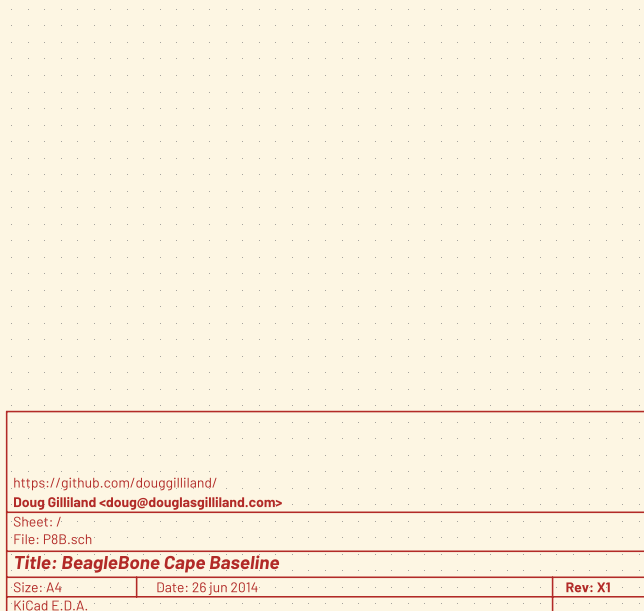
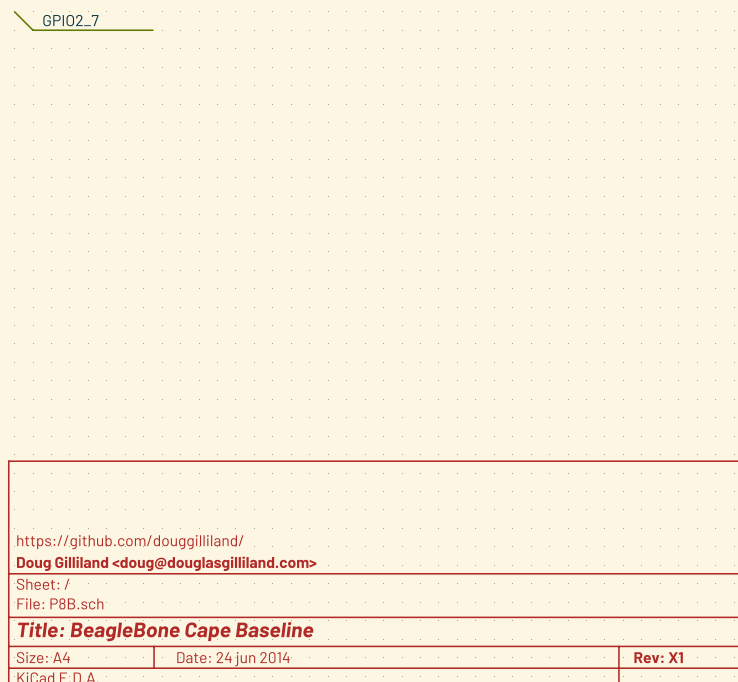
wire: none -> (14, 11) (33, 30) (152, 30)
label: none -> GPIO2_7 (70, 20)
title block: Date: 26 jun 2014 (207, 588) -> Date: 24 jun 2014 (233, 659)

